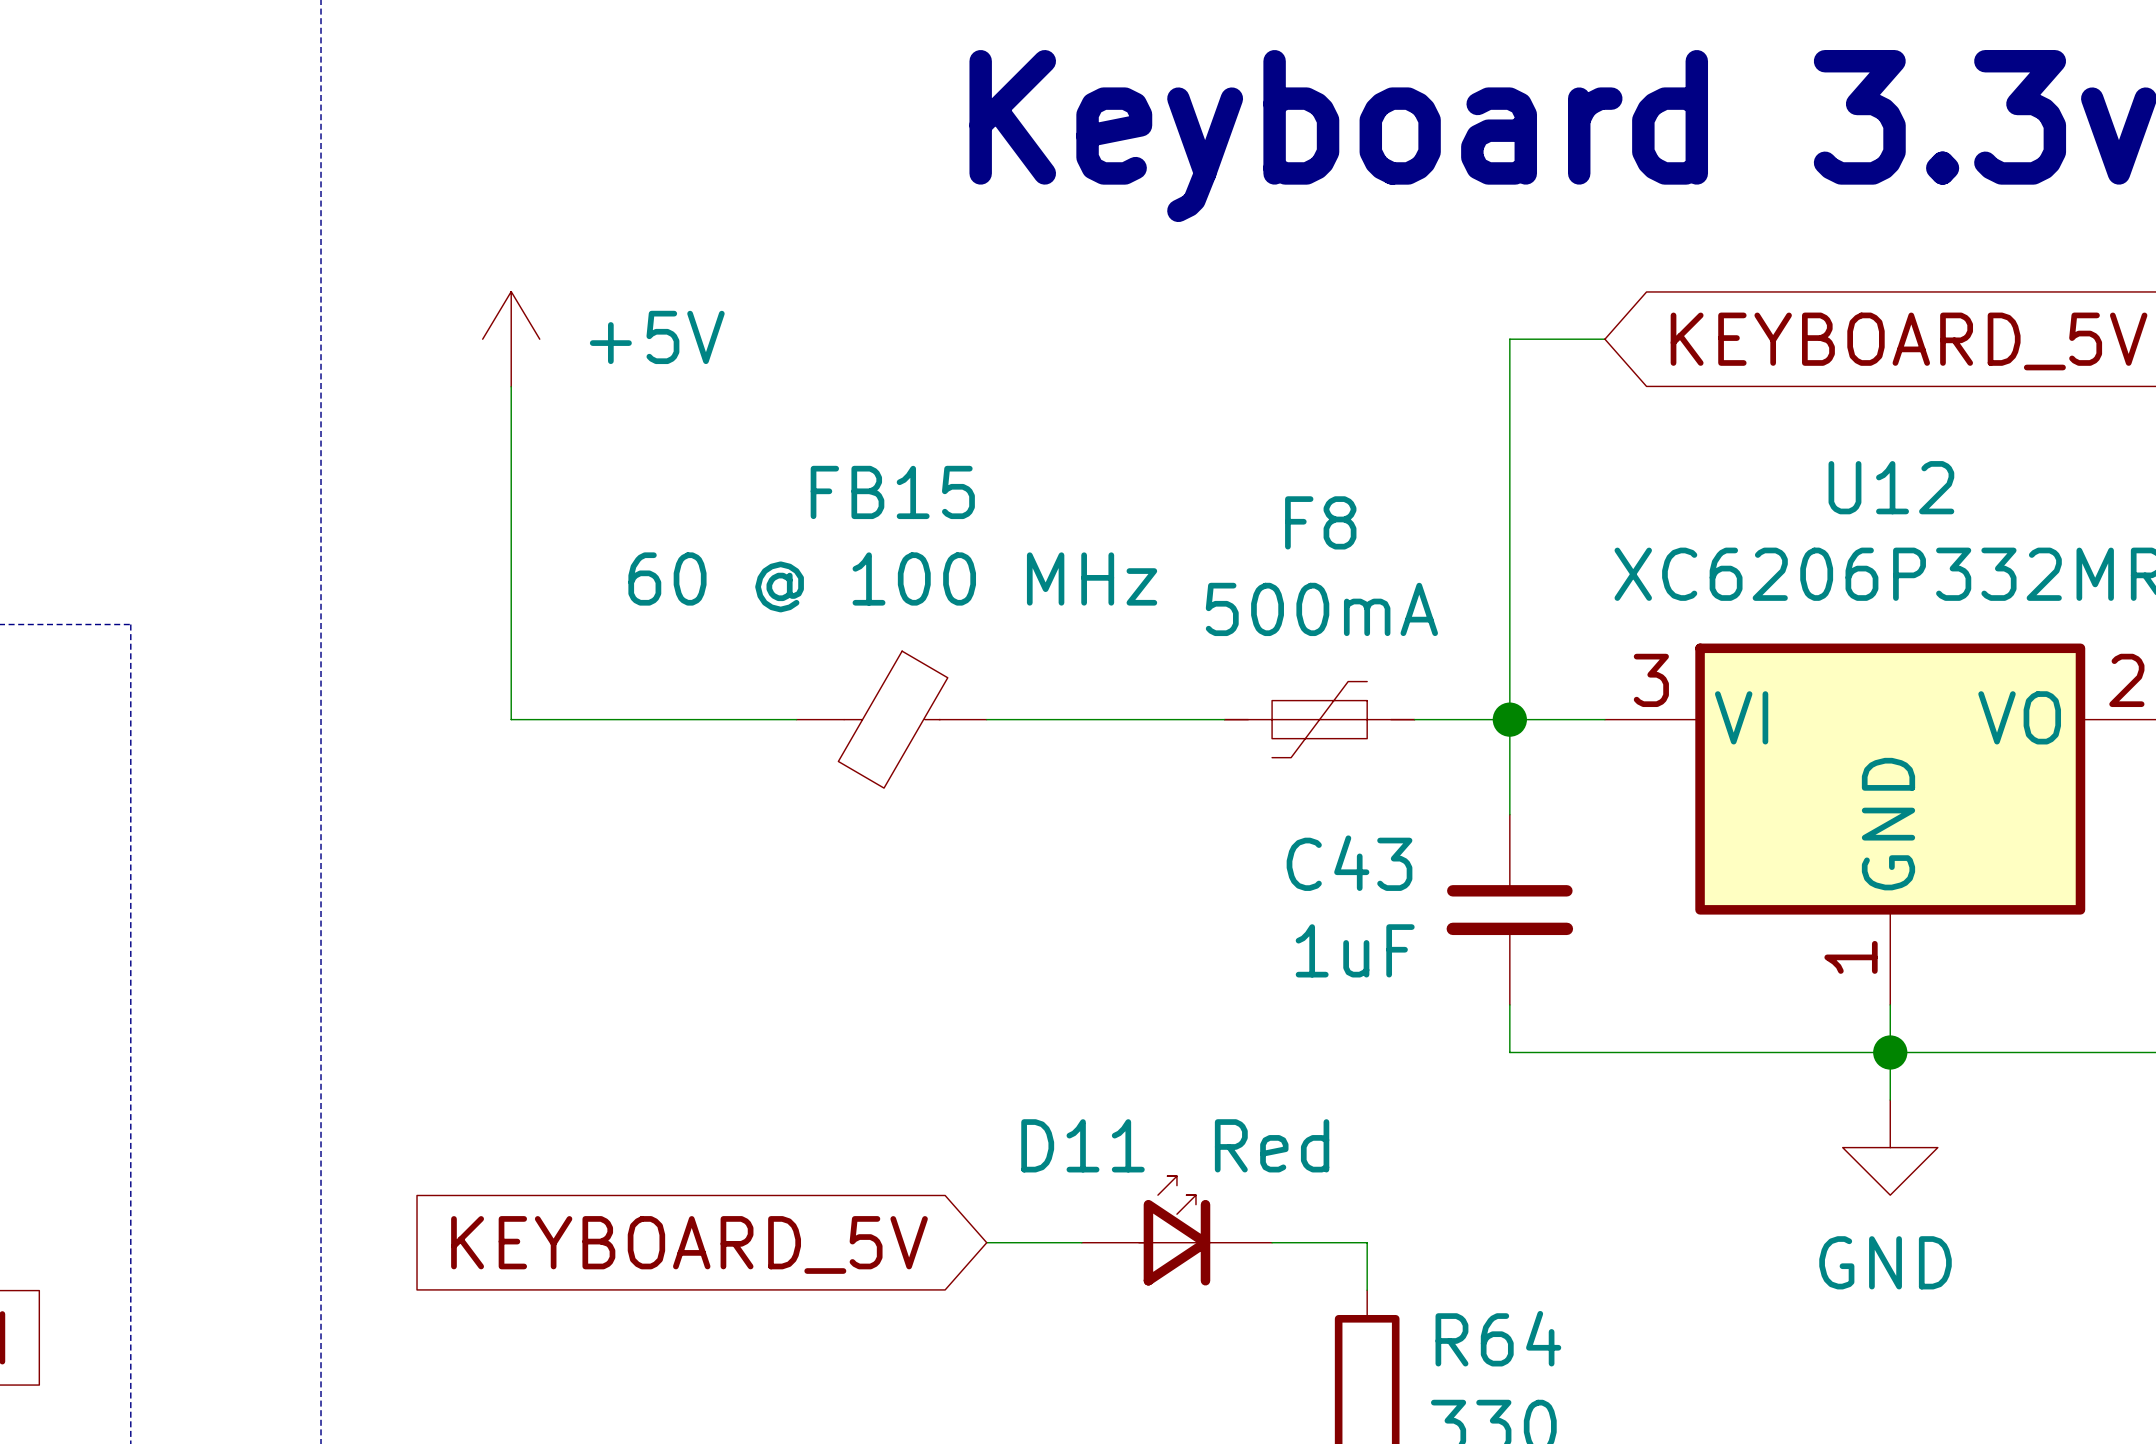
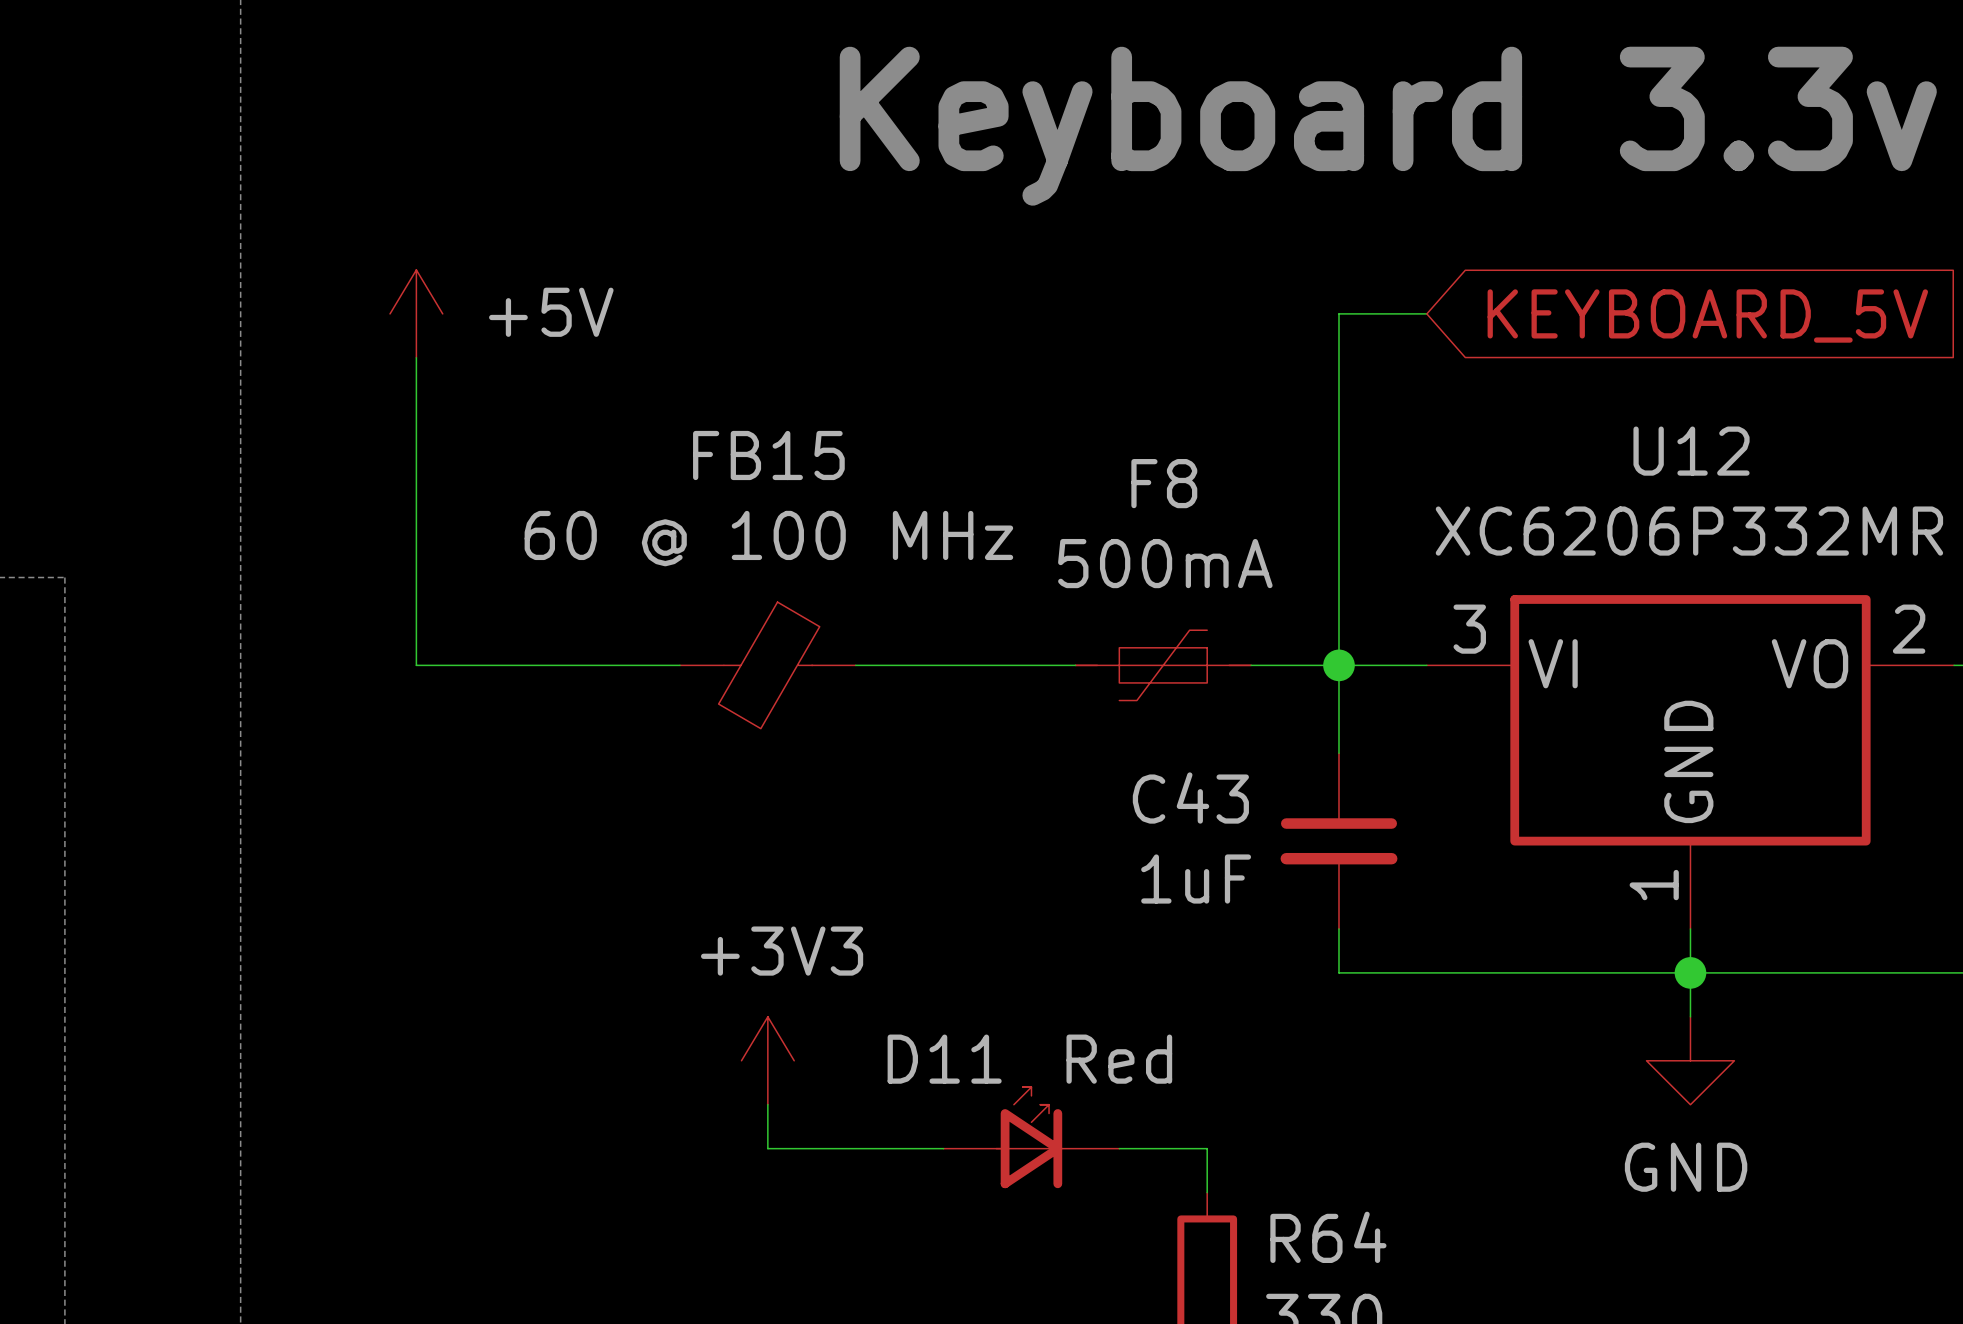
power symbol: none -> +3V3 (767, 1060)
wire: none -> (767, 1104) (767, 1148) (855, 1148)
global label: KEYBOARD_5V (689, 1244) -> none

